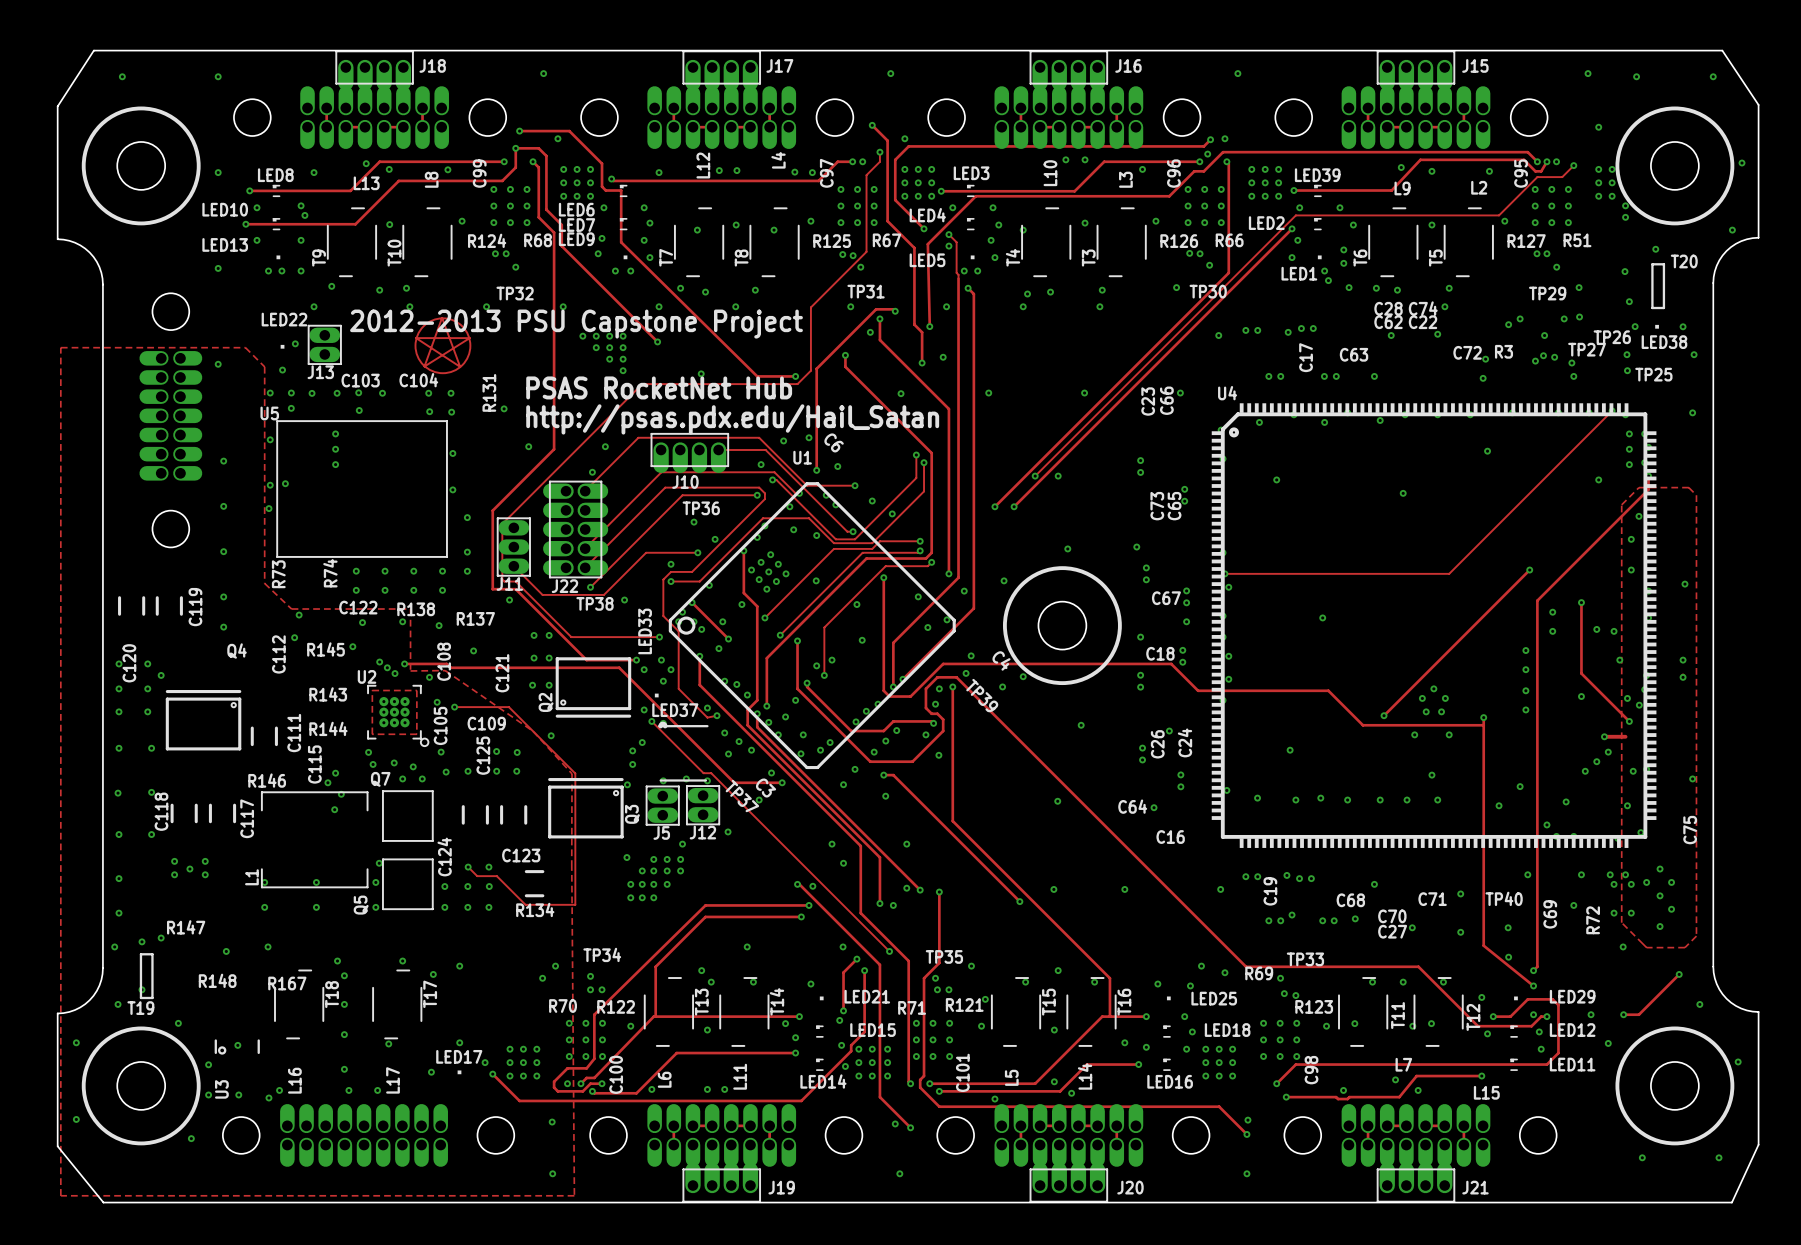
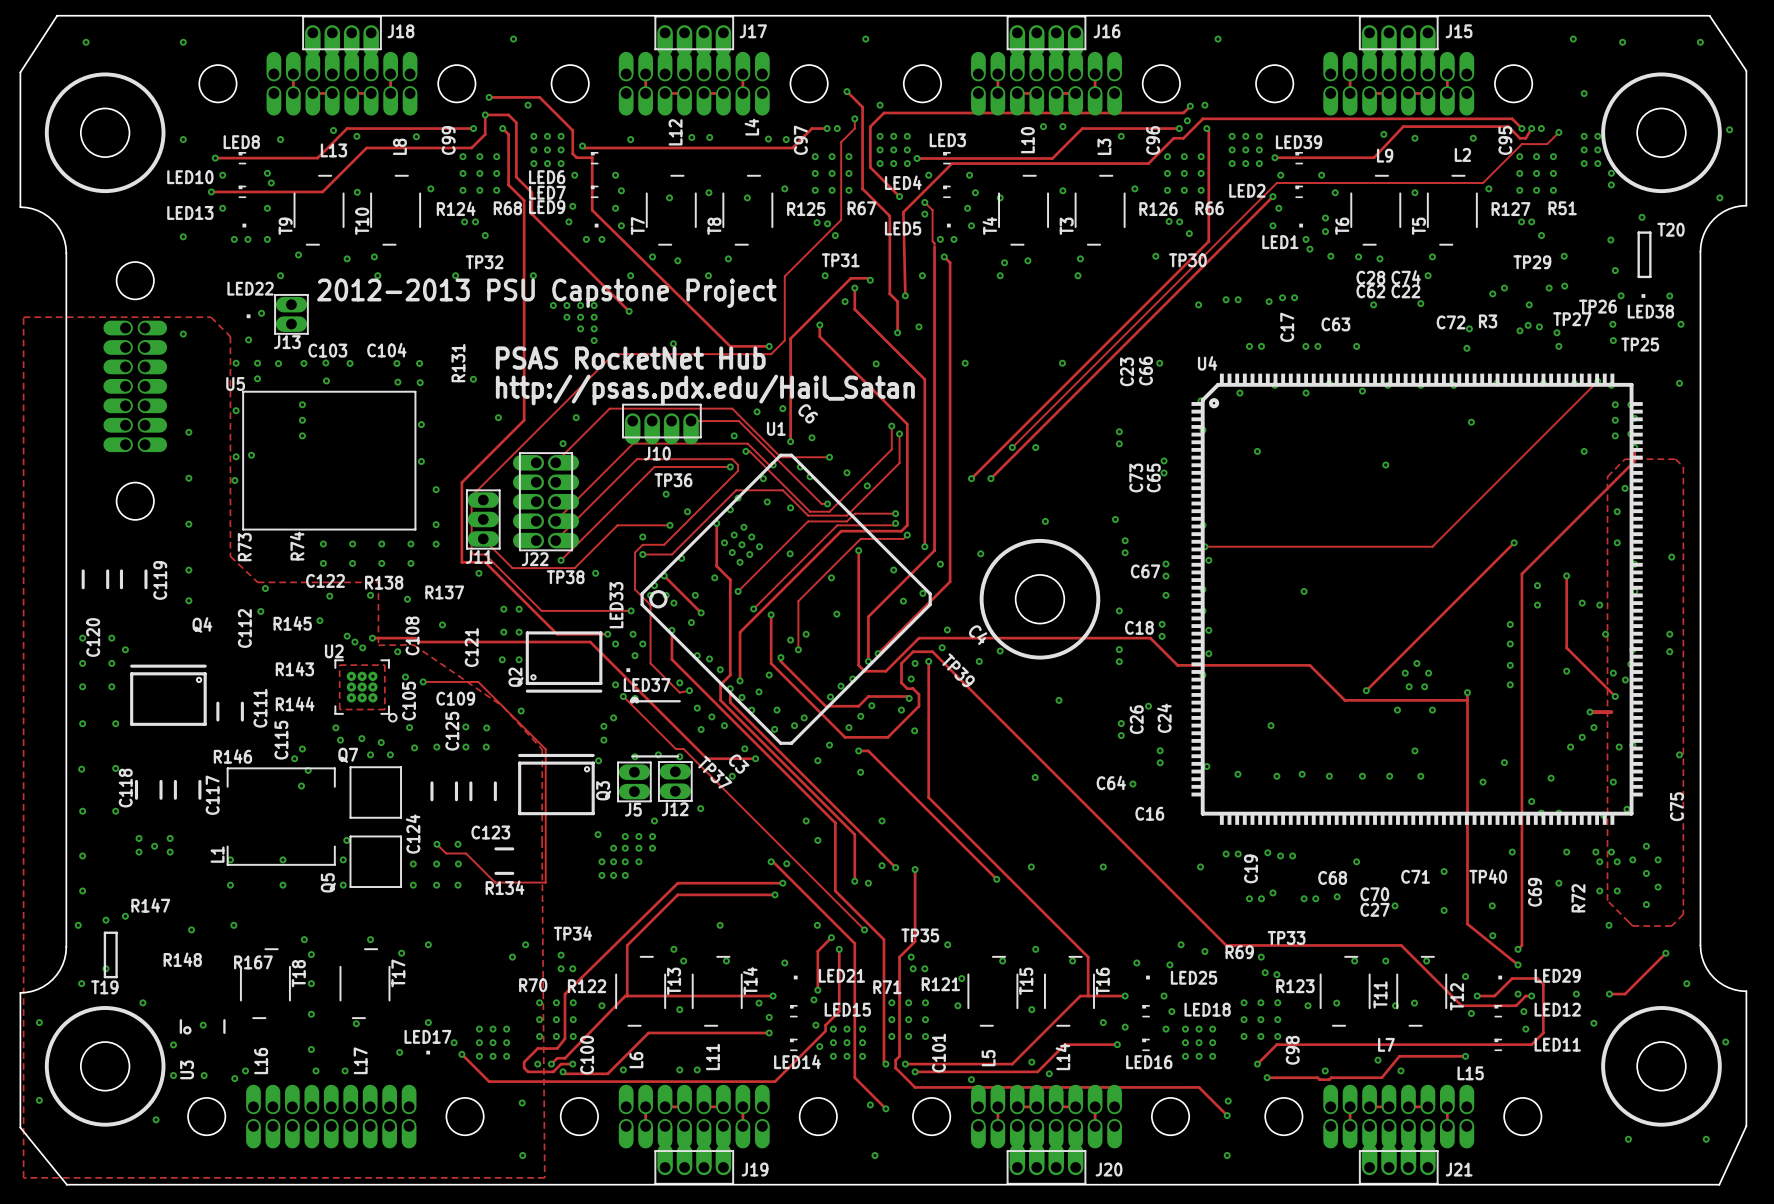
drawing: [414, 317, 472, 375] -> none
track: (442, 317) (424, 366) (469, 338) (416, 338) (460, 366) (442, 317) -> none

